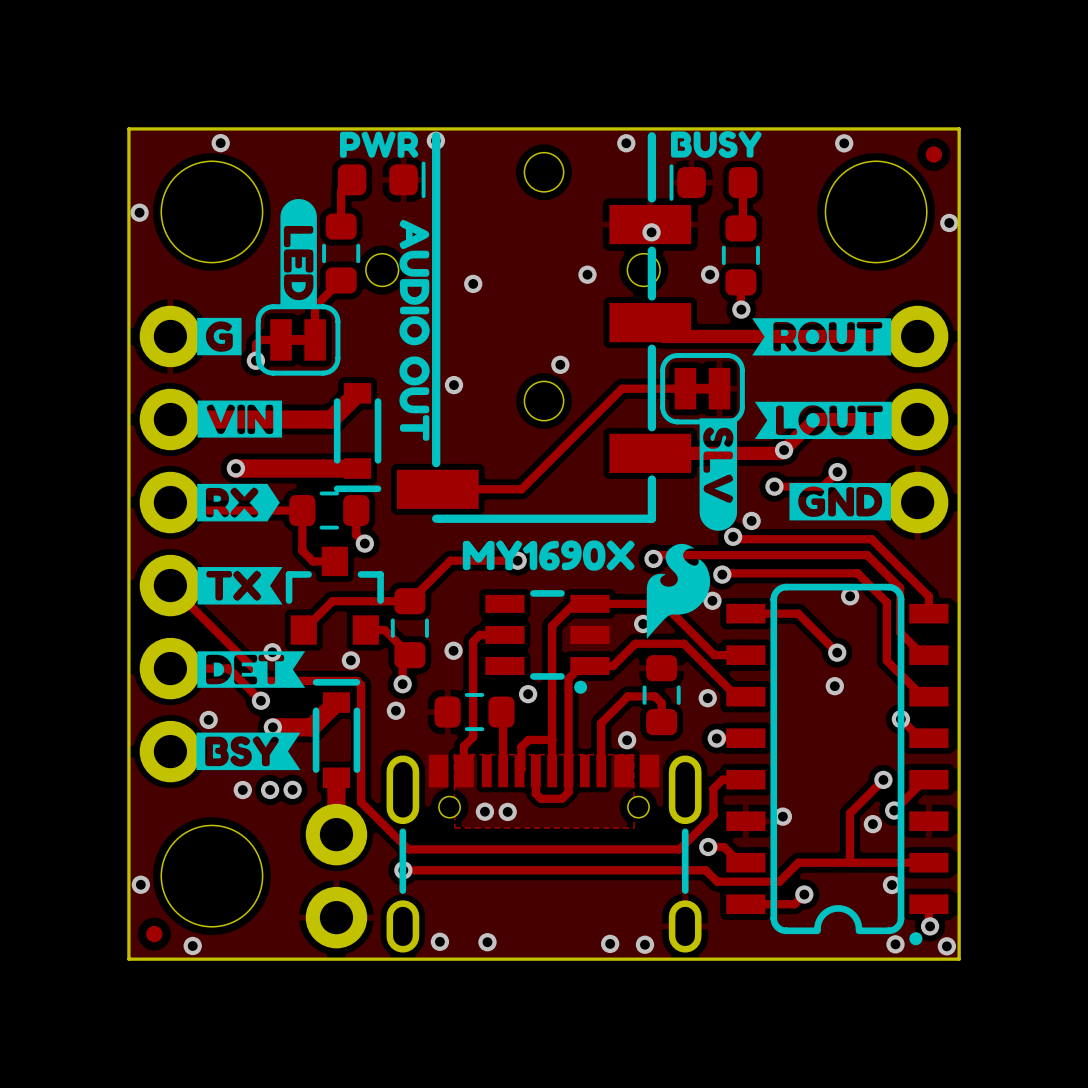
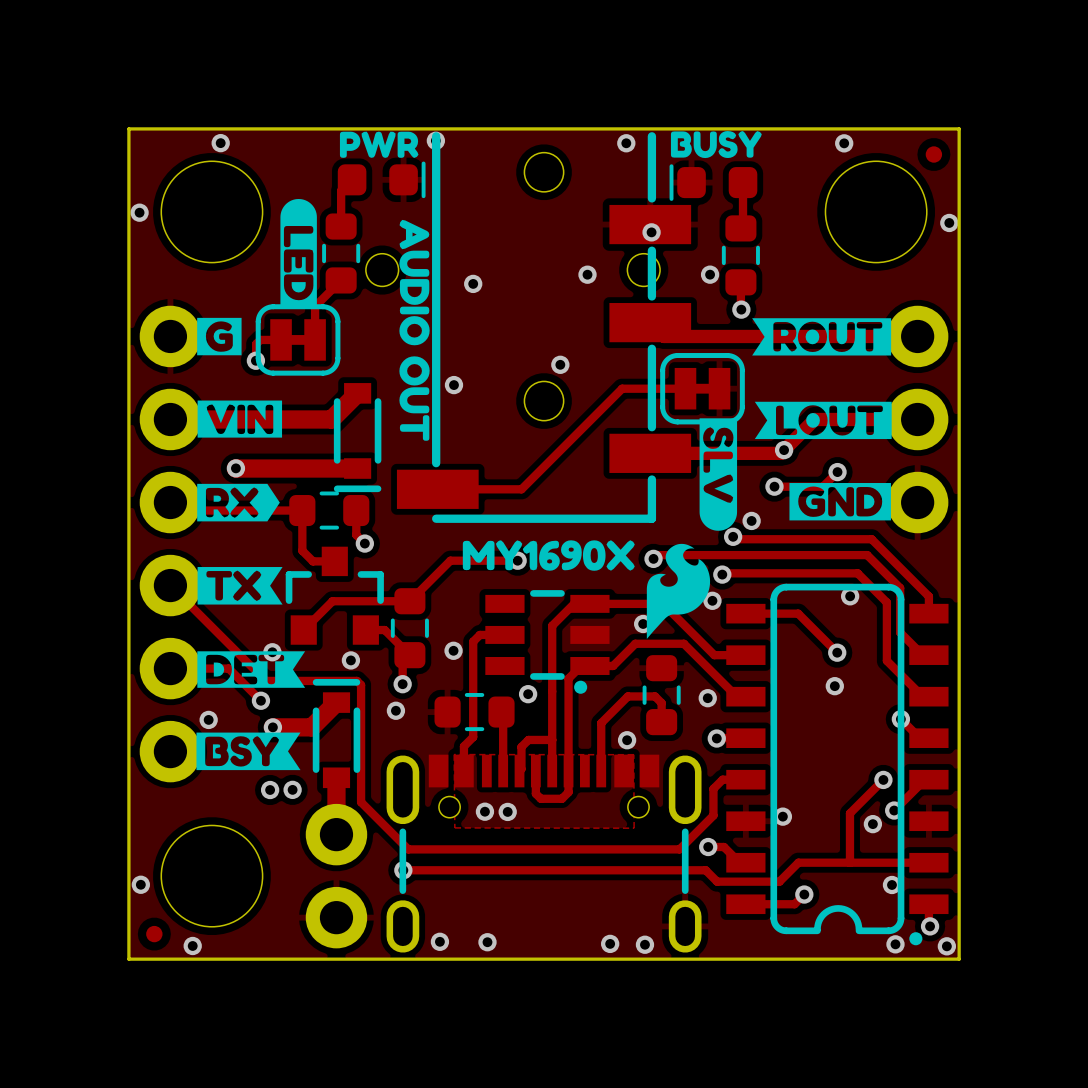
via: (242, 790) -> none

